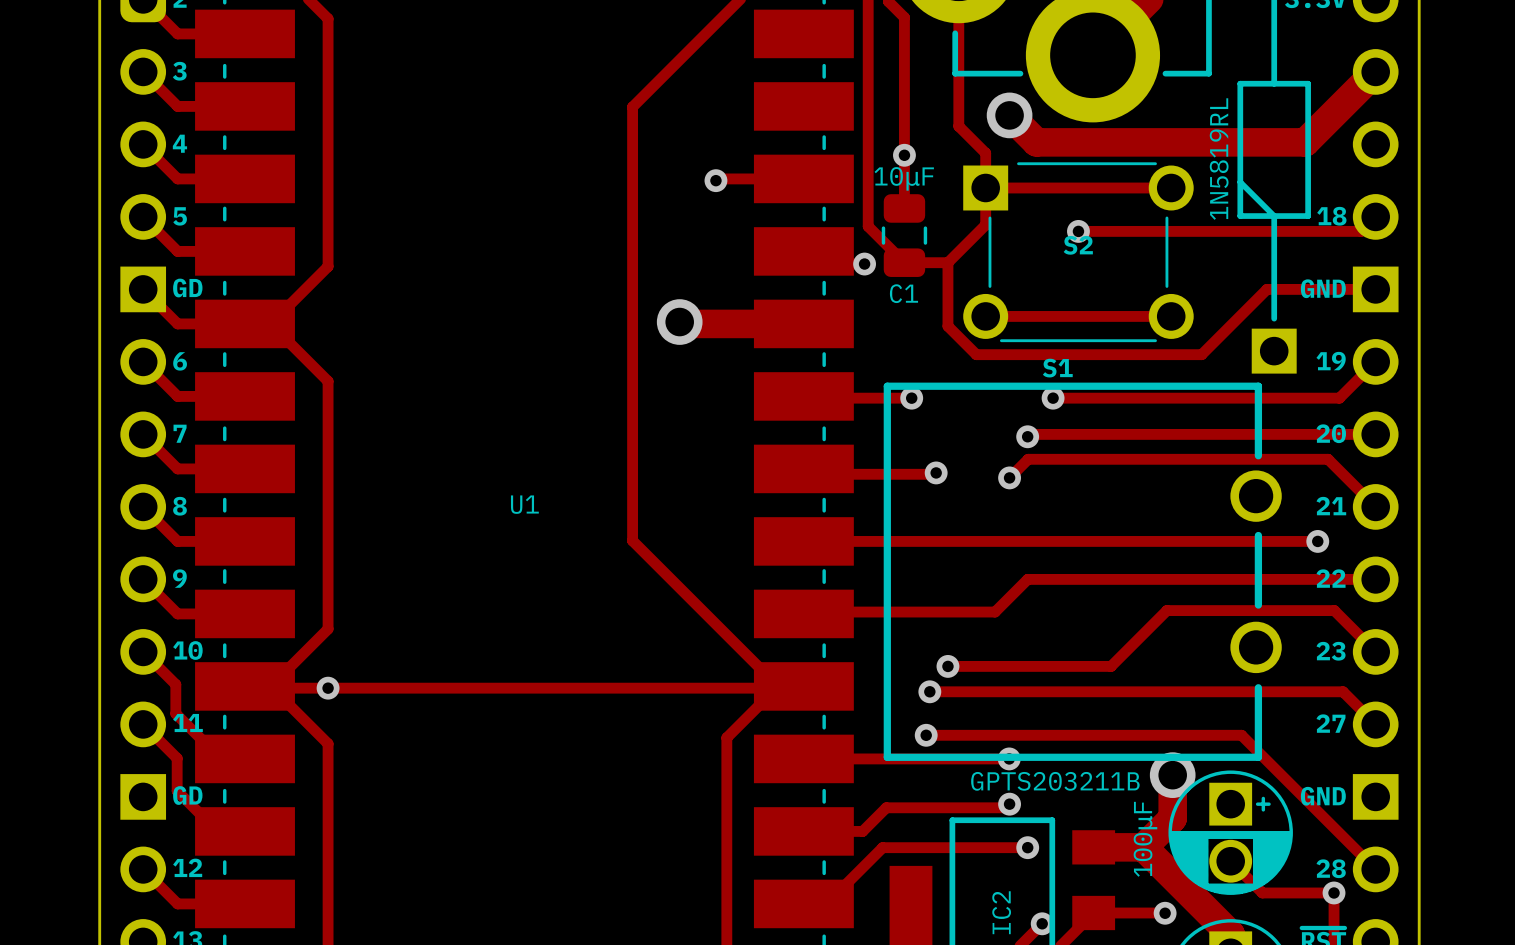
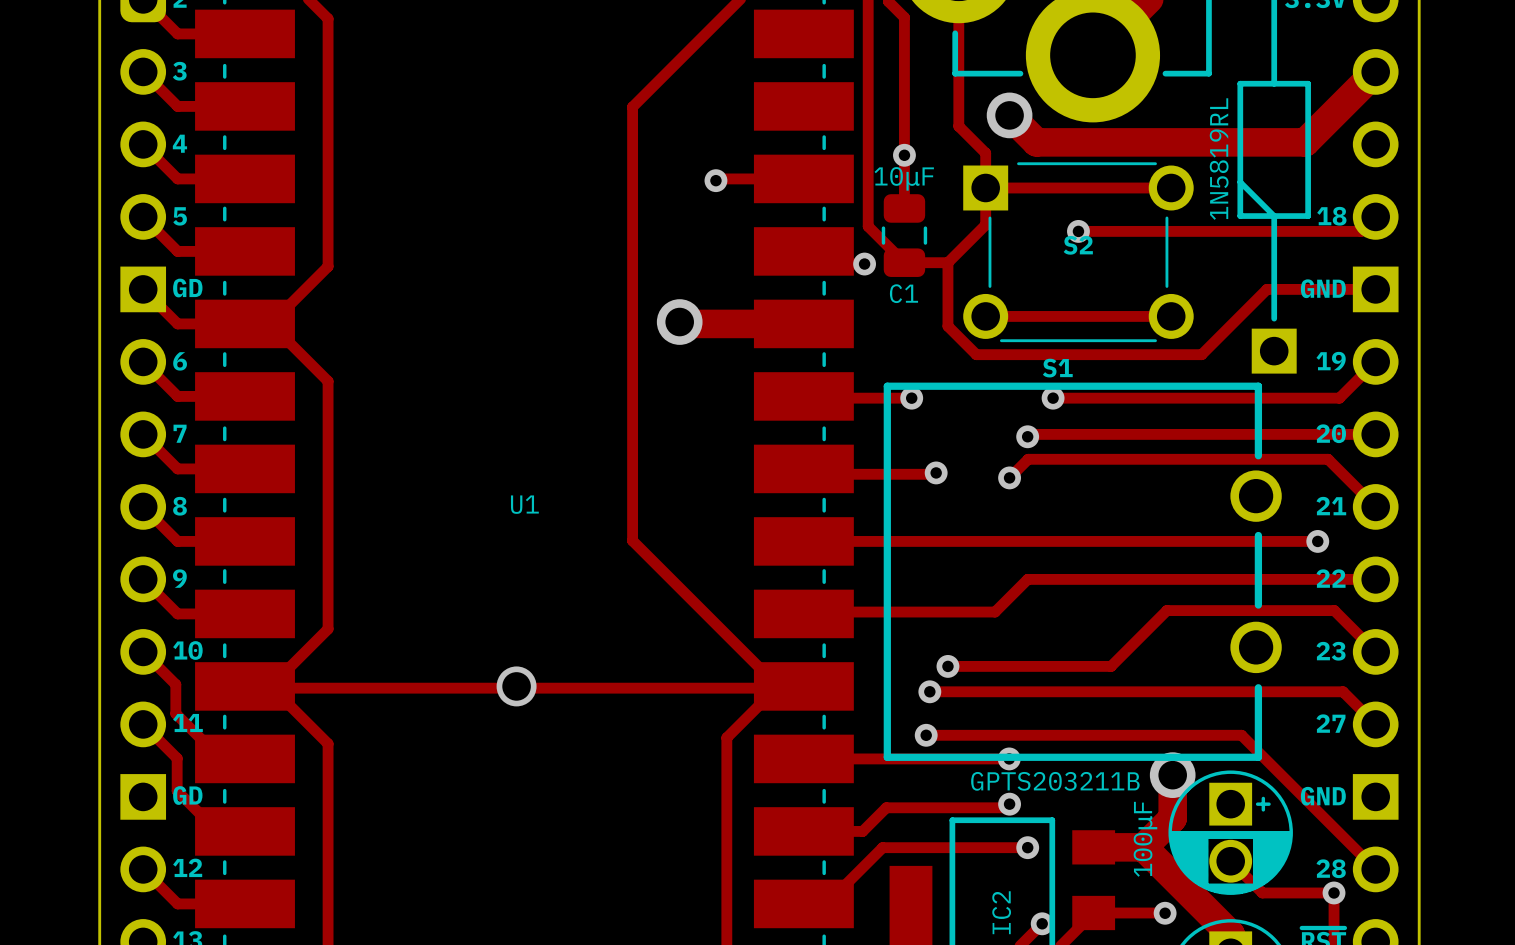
via: none -> (516, 686)
via: (328, 688) -> none

